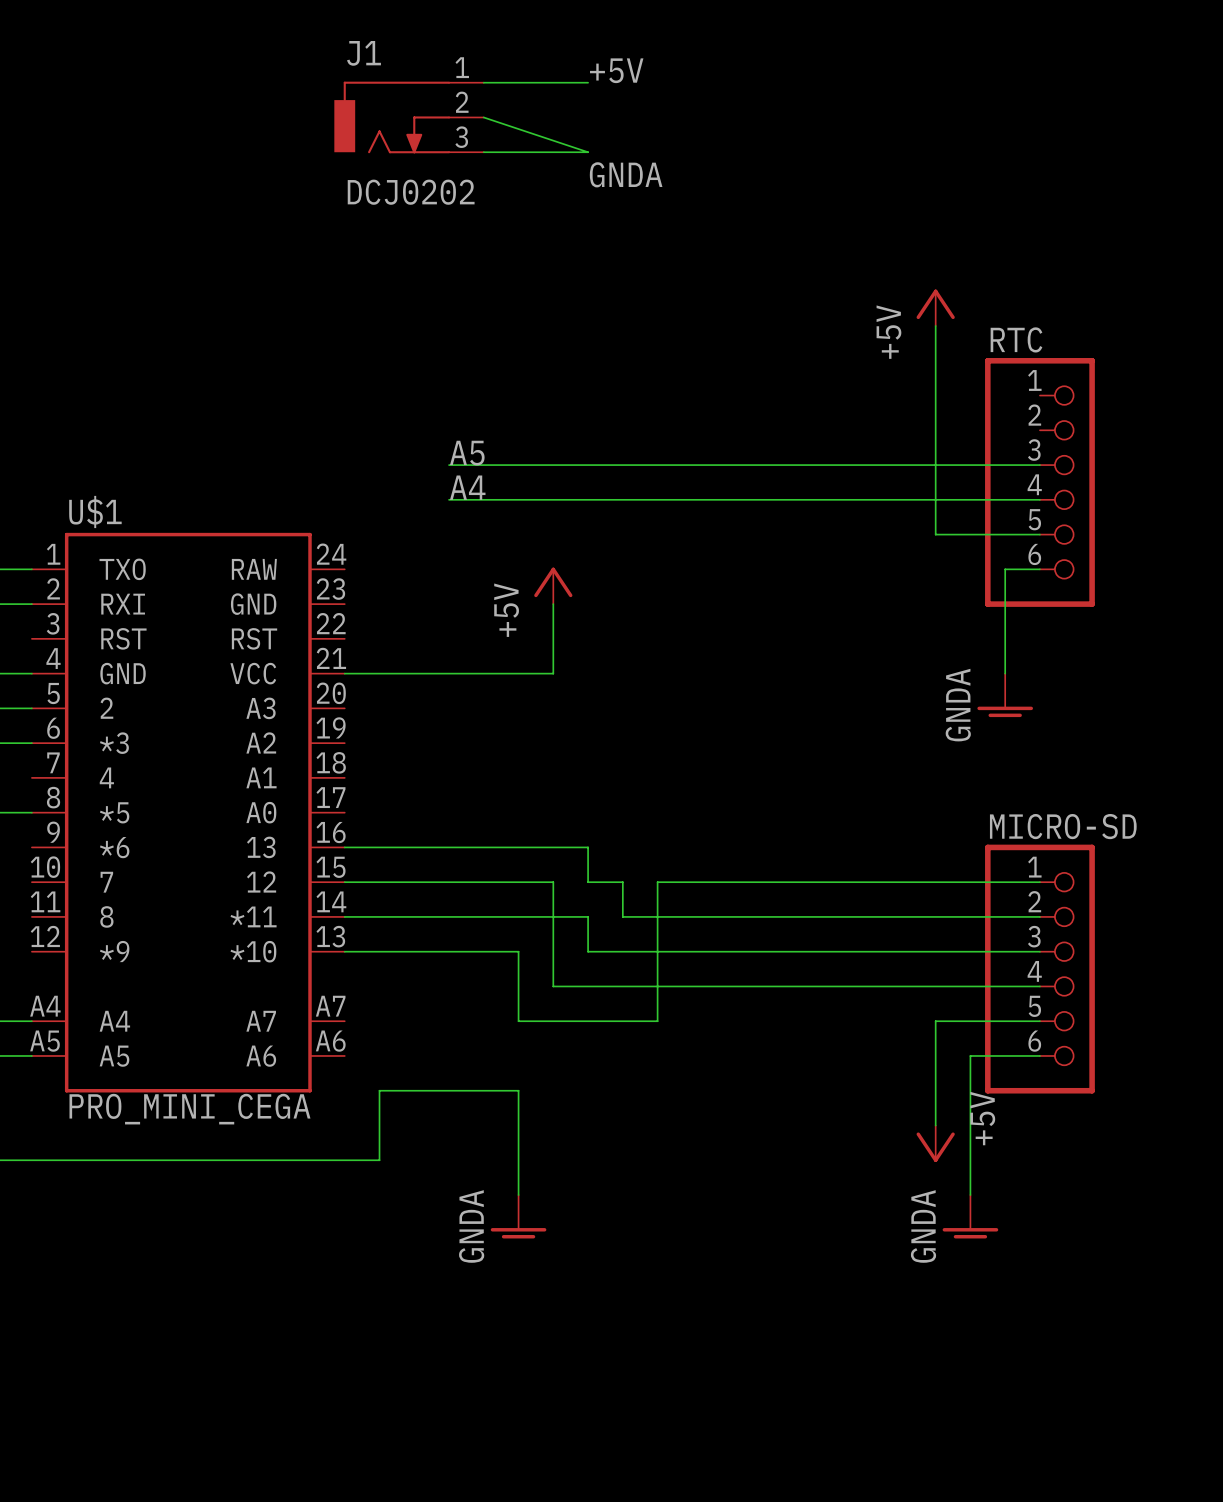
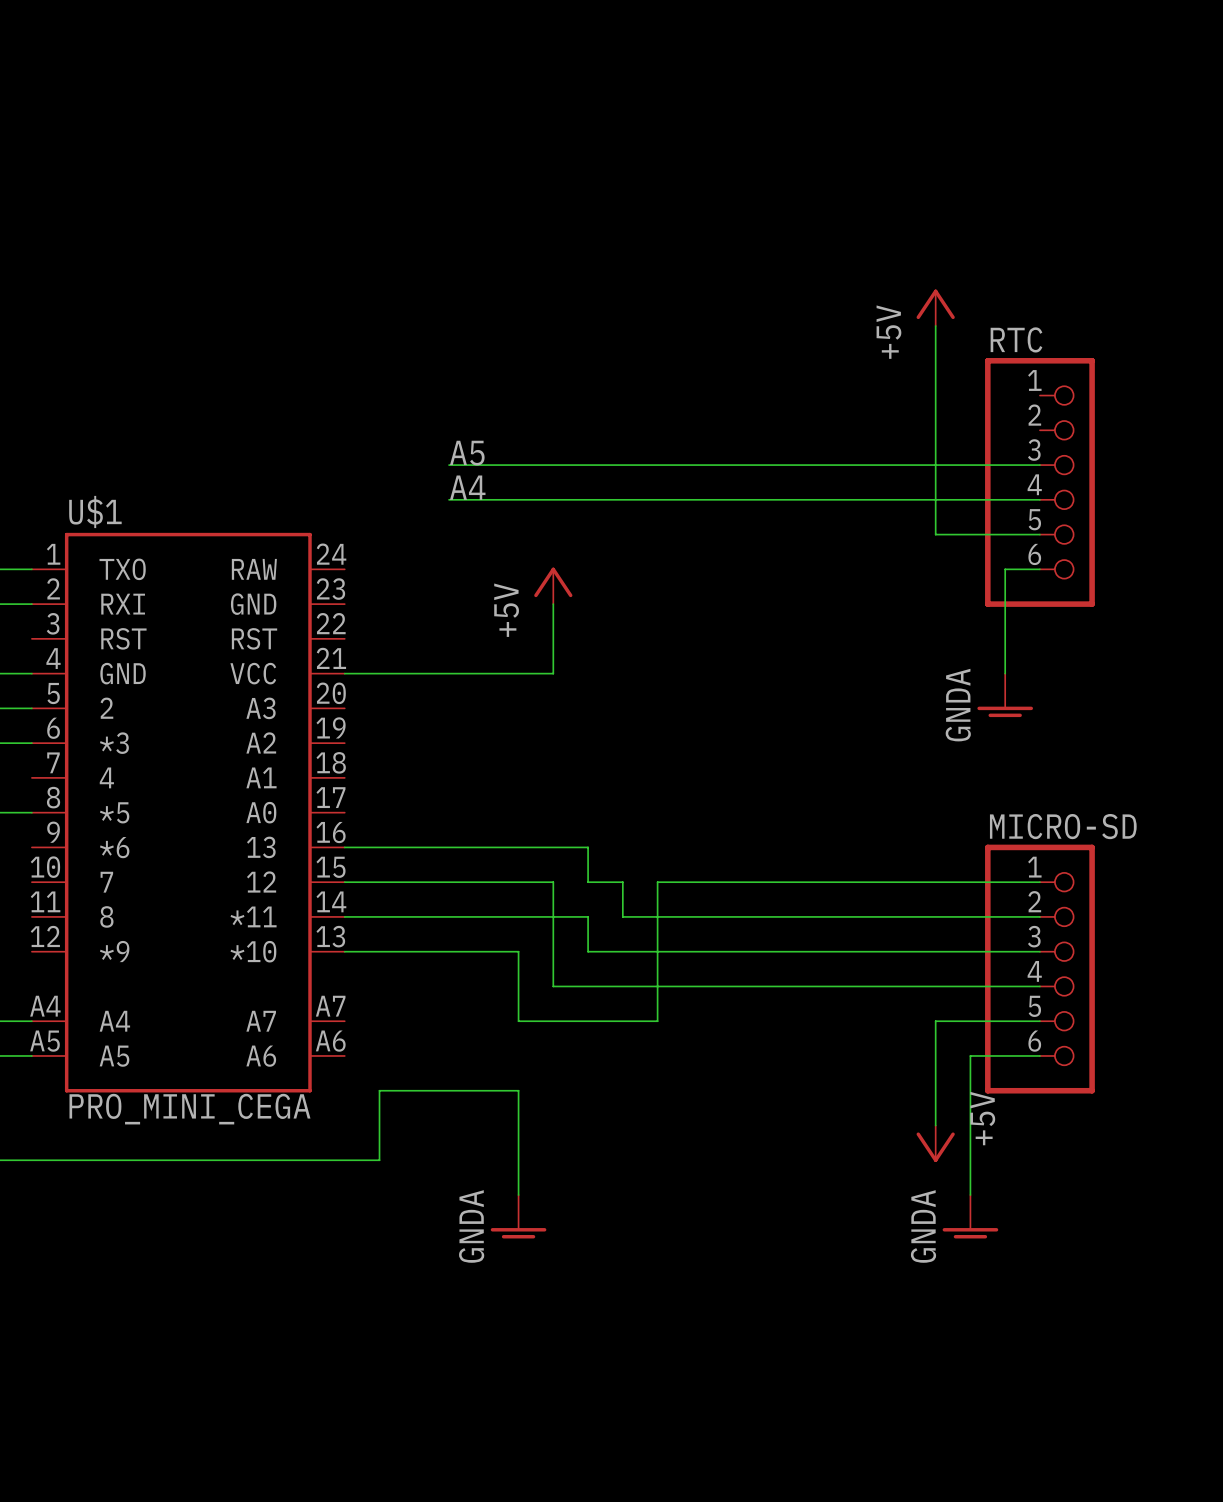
label: +5V (616, 70) -> none
wire: (483, 82) (588, 82) -> none
J1: DCJ0202 (409, 117) -> none
wire: (483, 117) (588, 152) (483, 152) -> none
label: GNDA (626, 174) -> none

